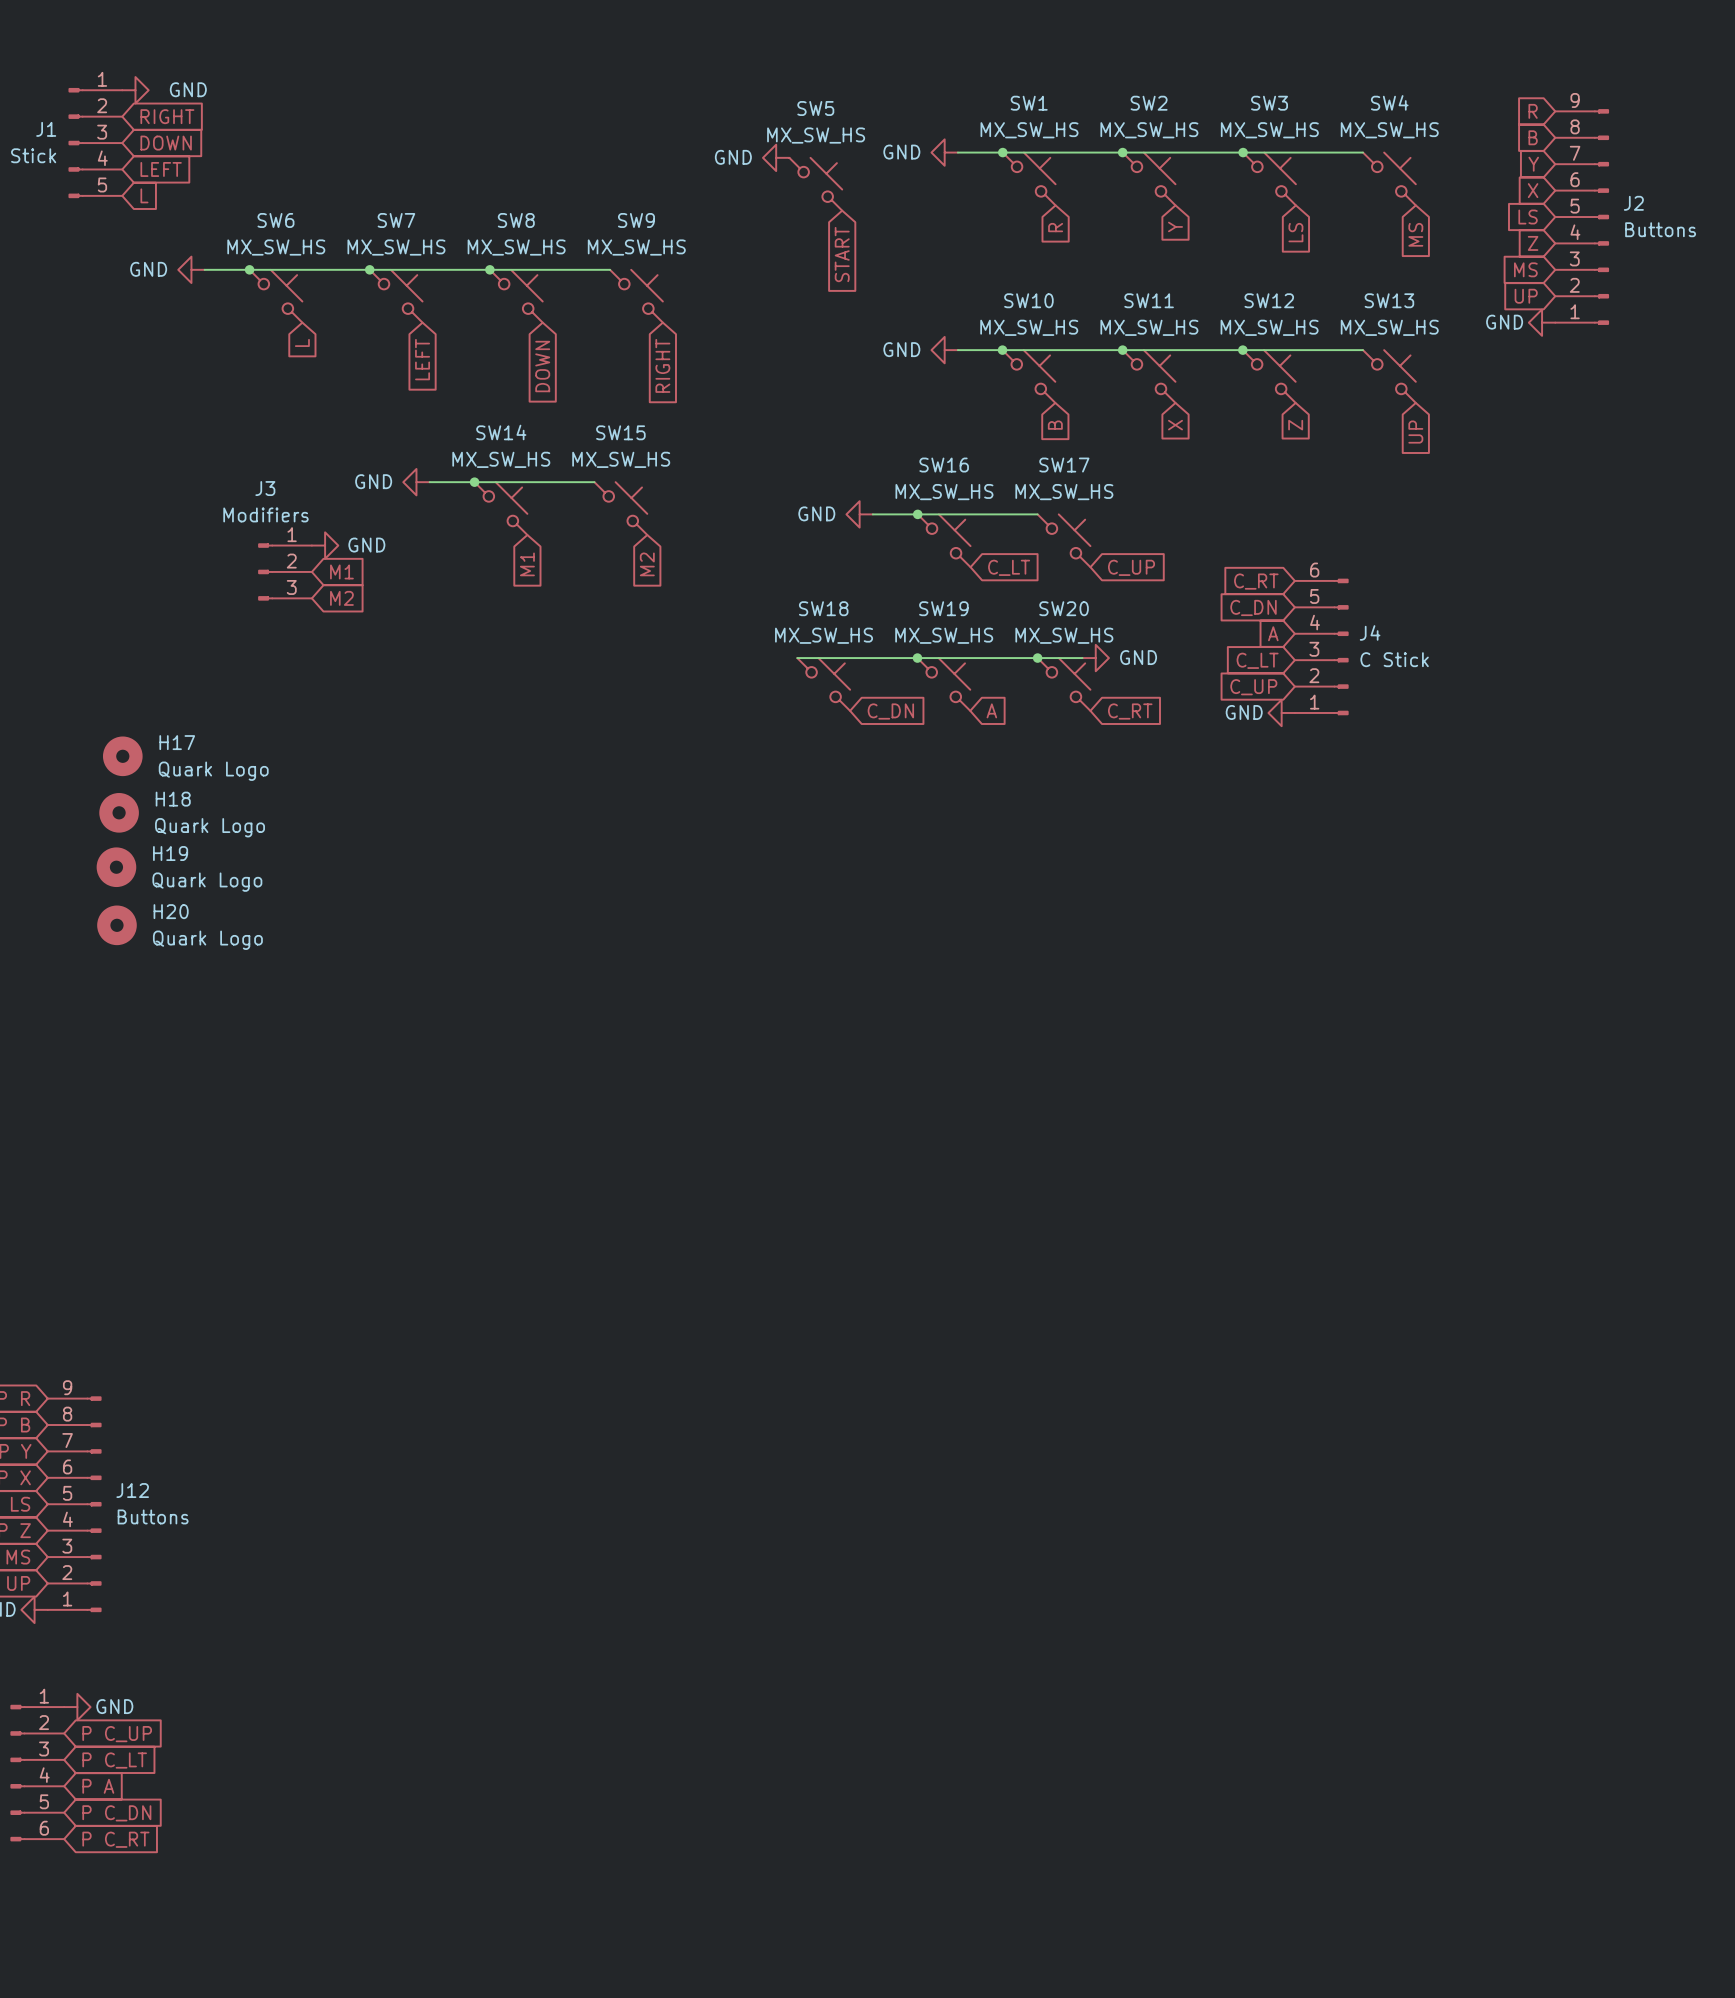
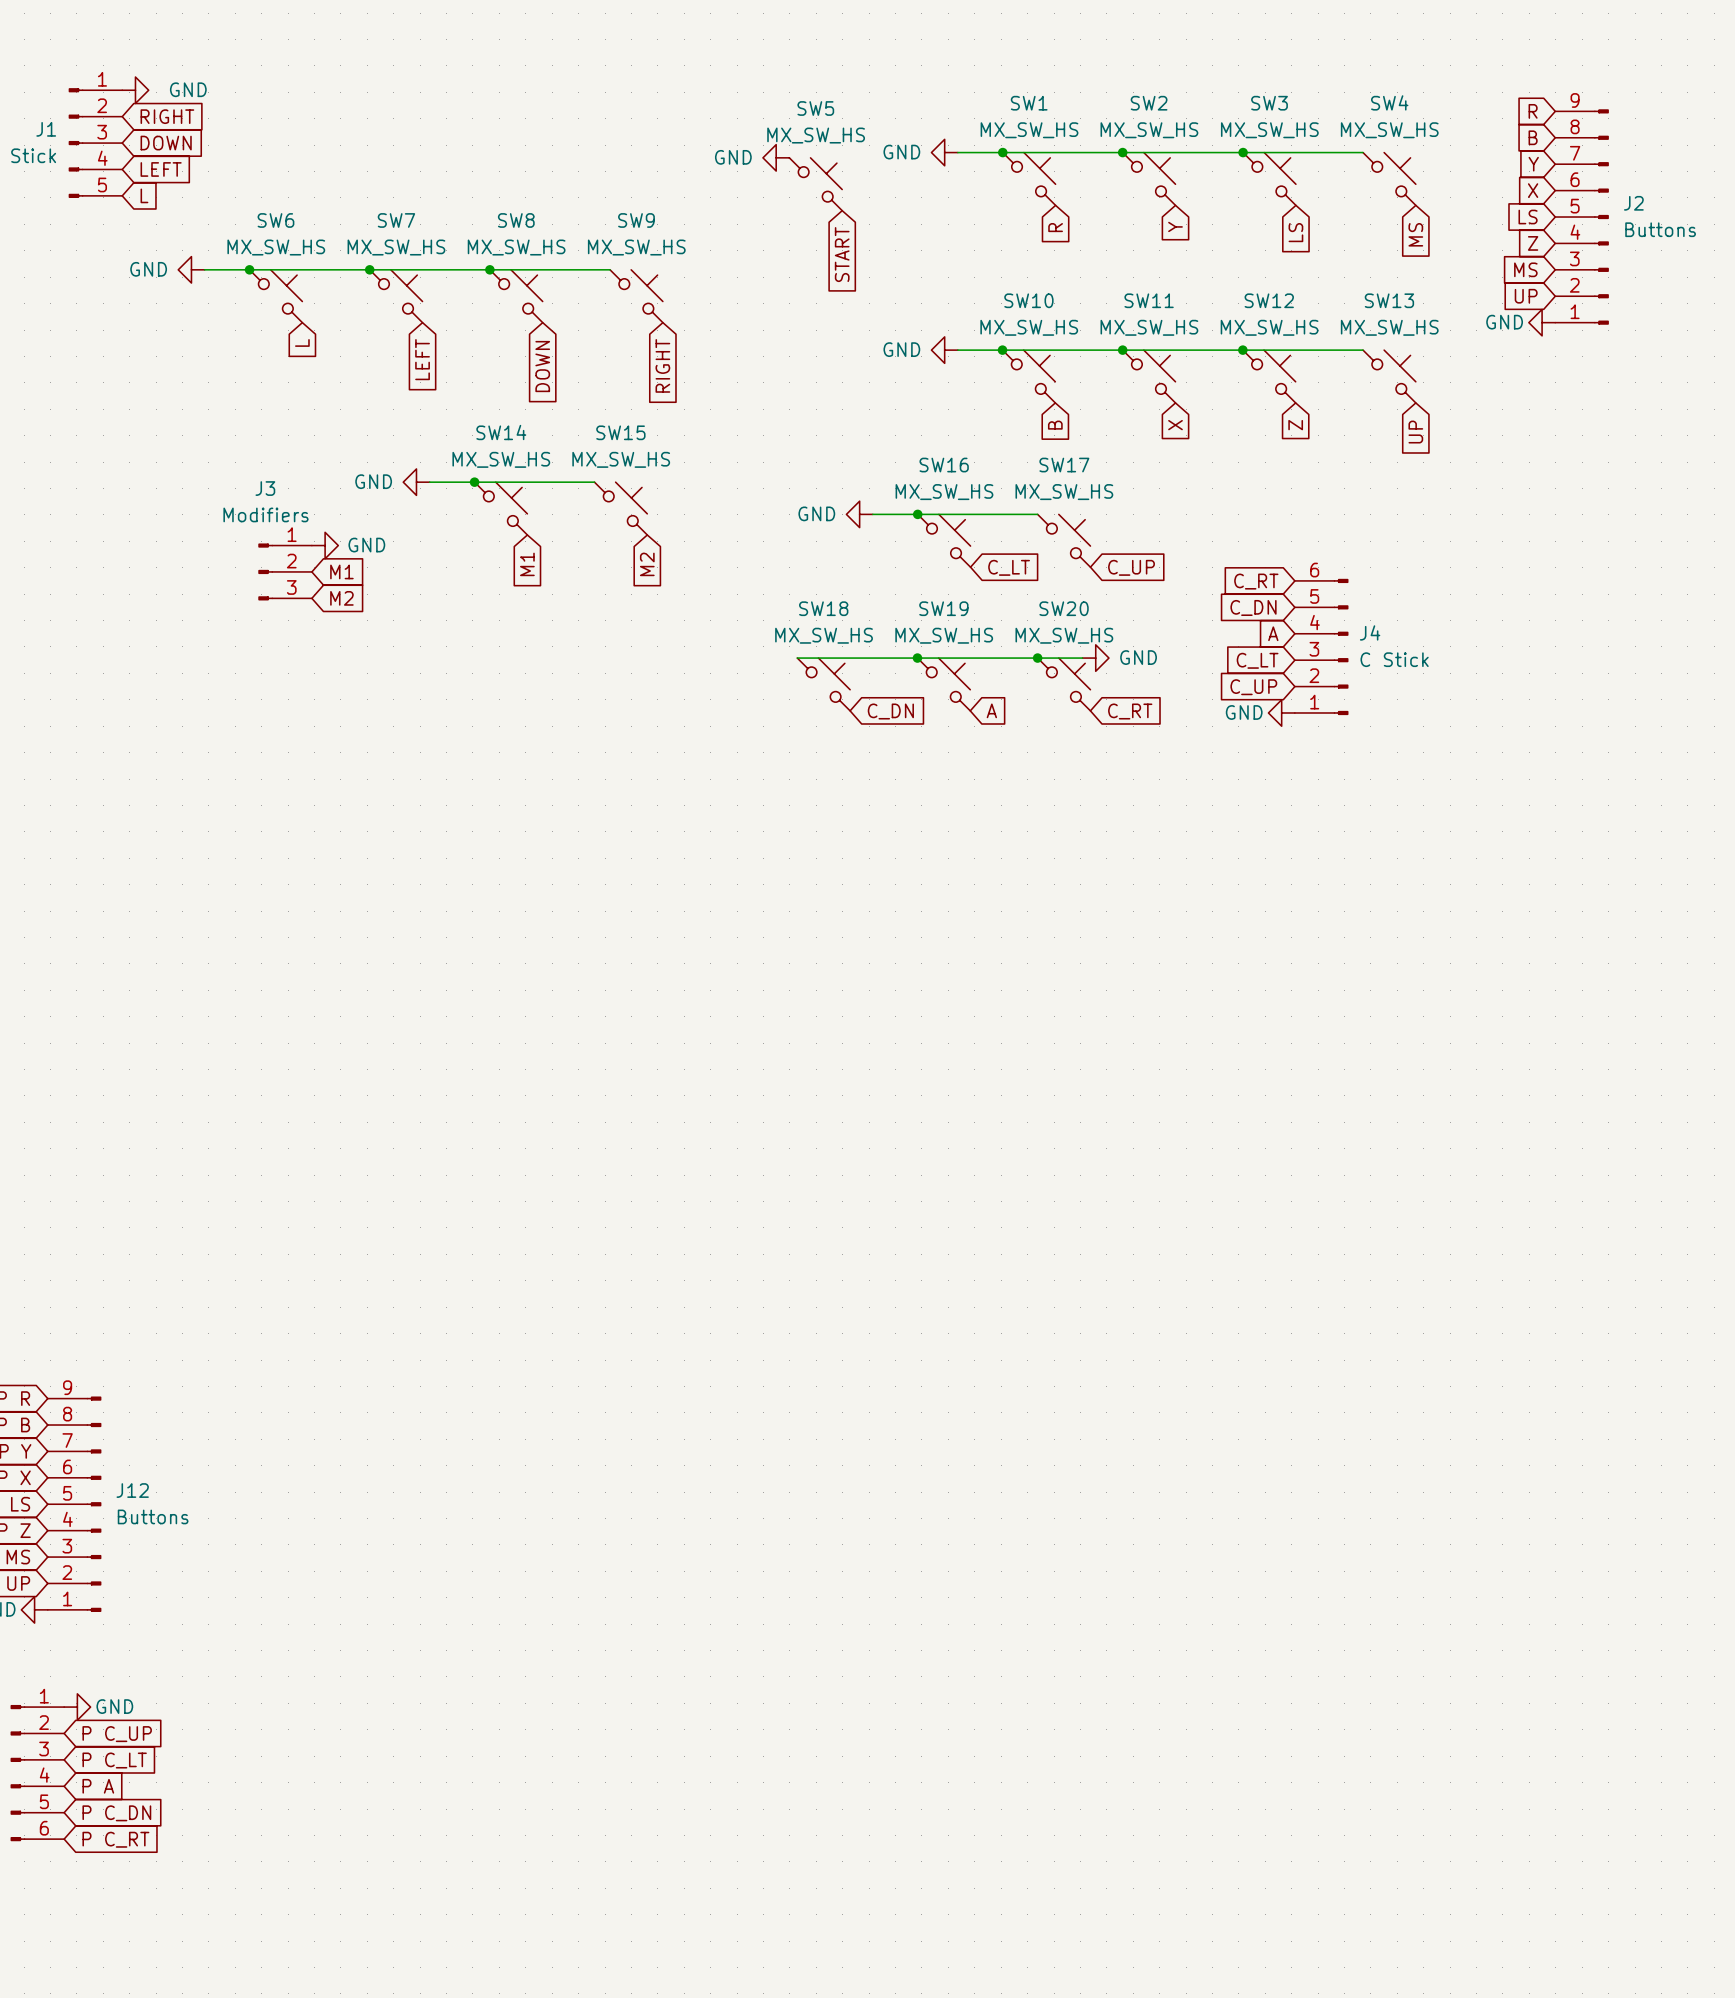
H17: Quark Logo (122, 756) -> none
H18: Quark Logo (119, 812) -> none
H19: Quark Logo (116, 867) -> none
H20: Quark Logo (116, 925) -> none

